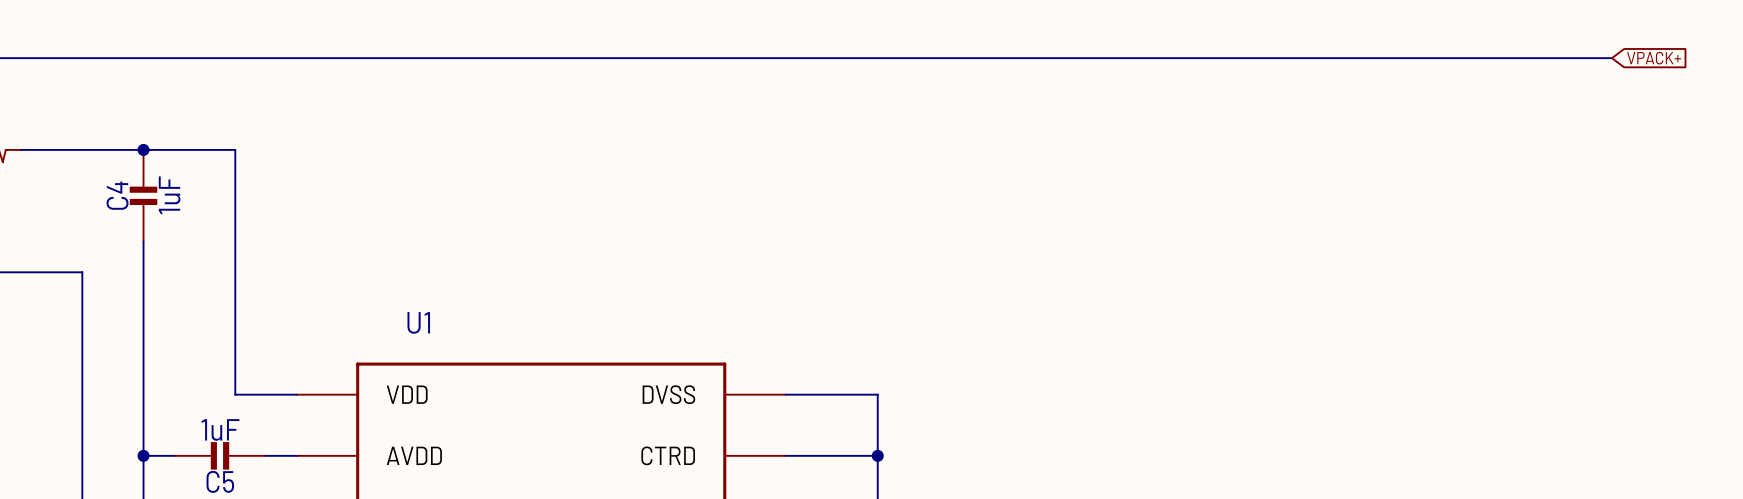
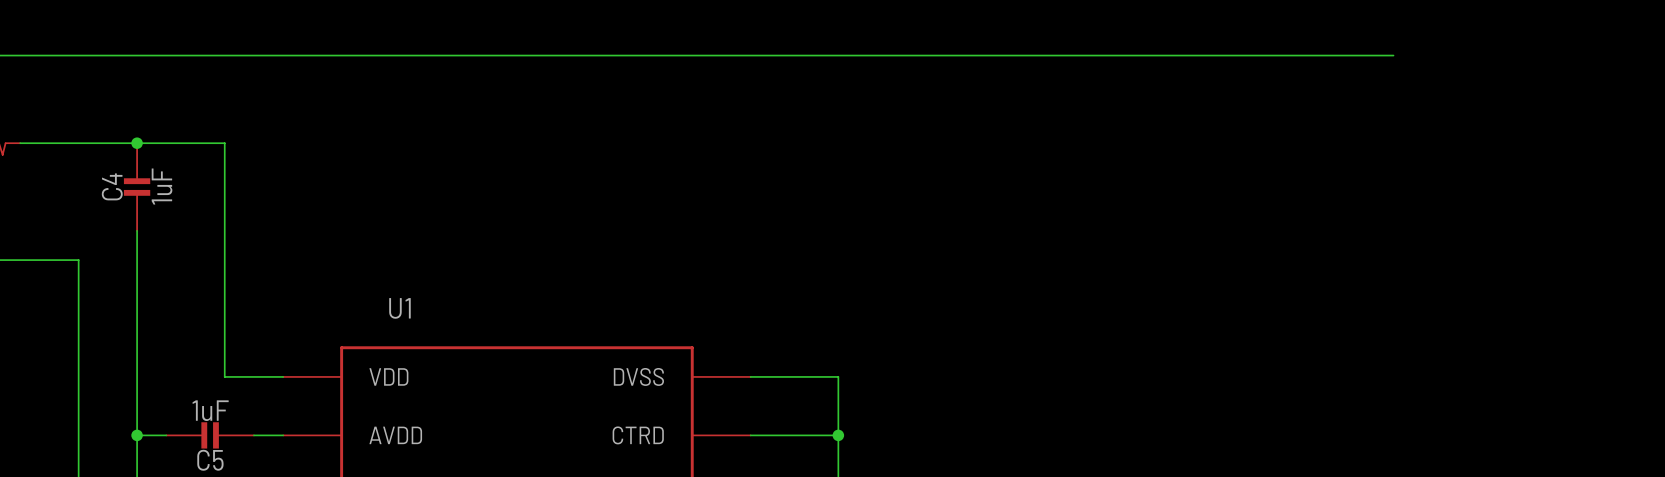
wire: (1459, 58) (1611, 58) -> none
global label: VPACK+ (1654, 58) -> none

